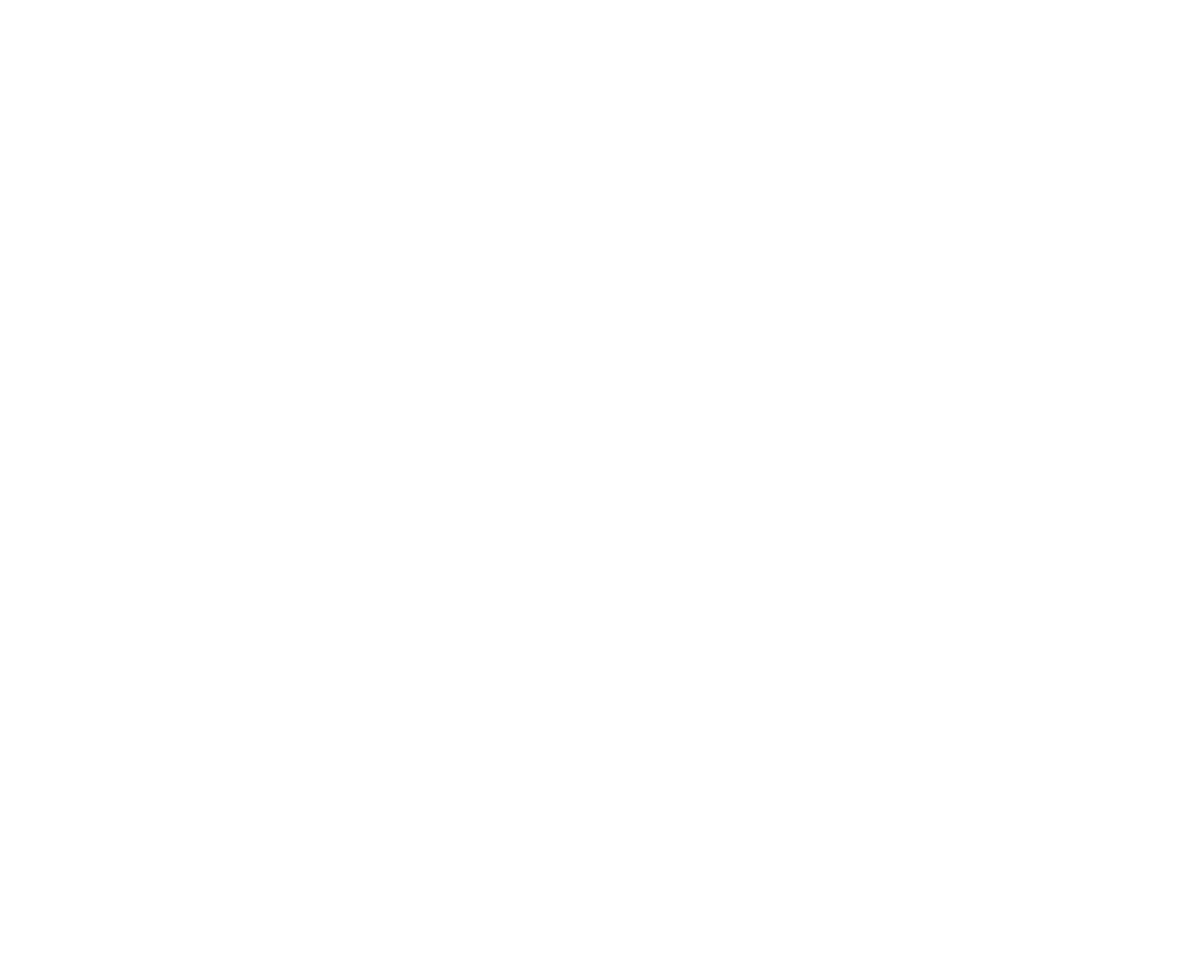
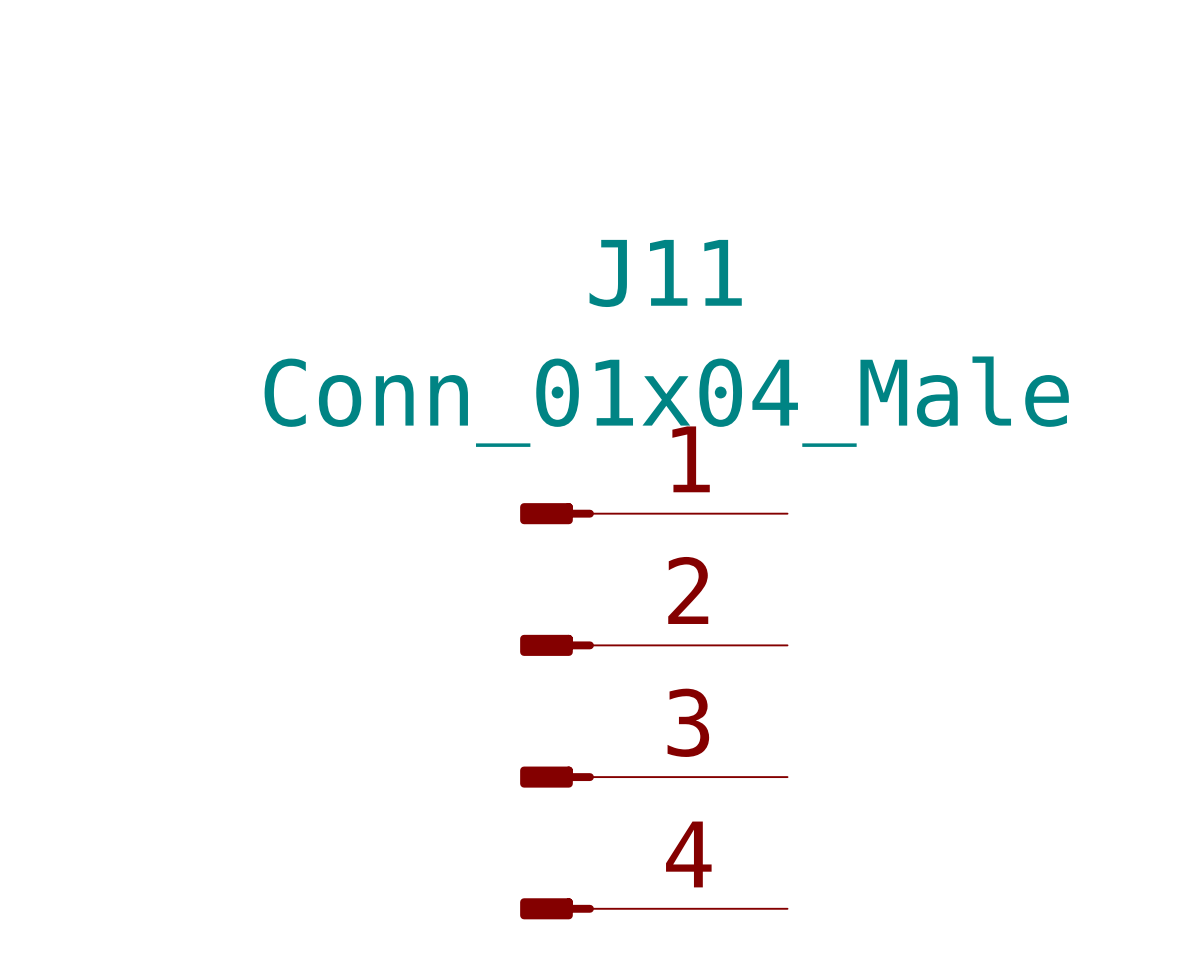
J11: none -> Conn_01x04_Male (653, 711)

